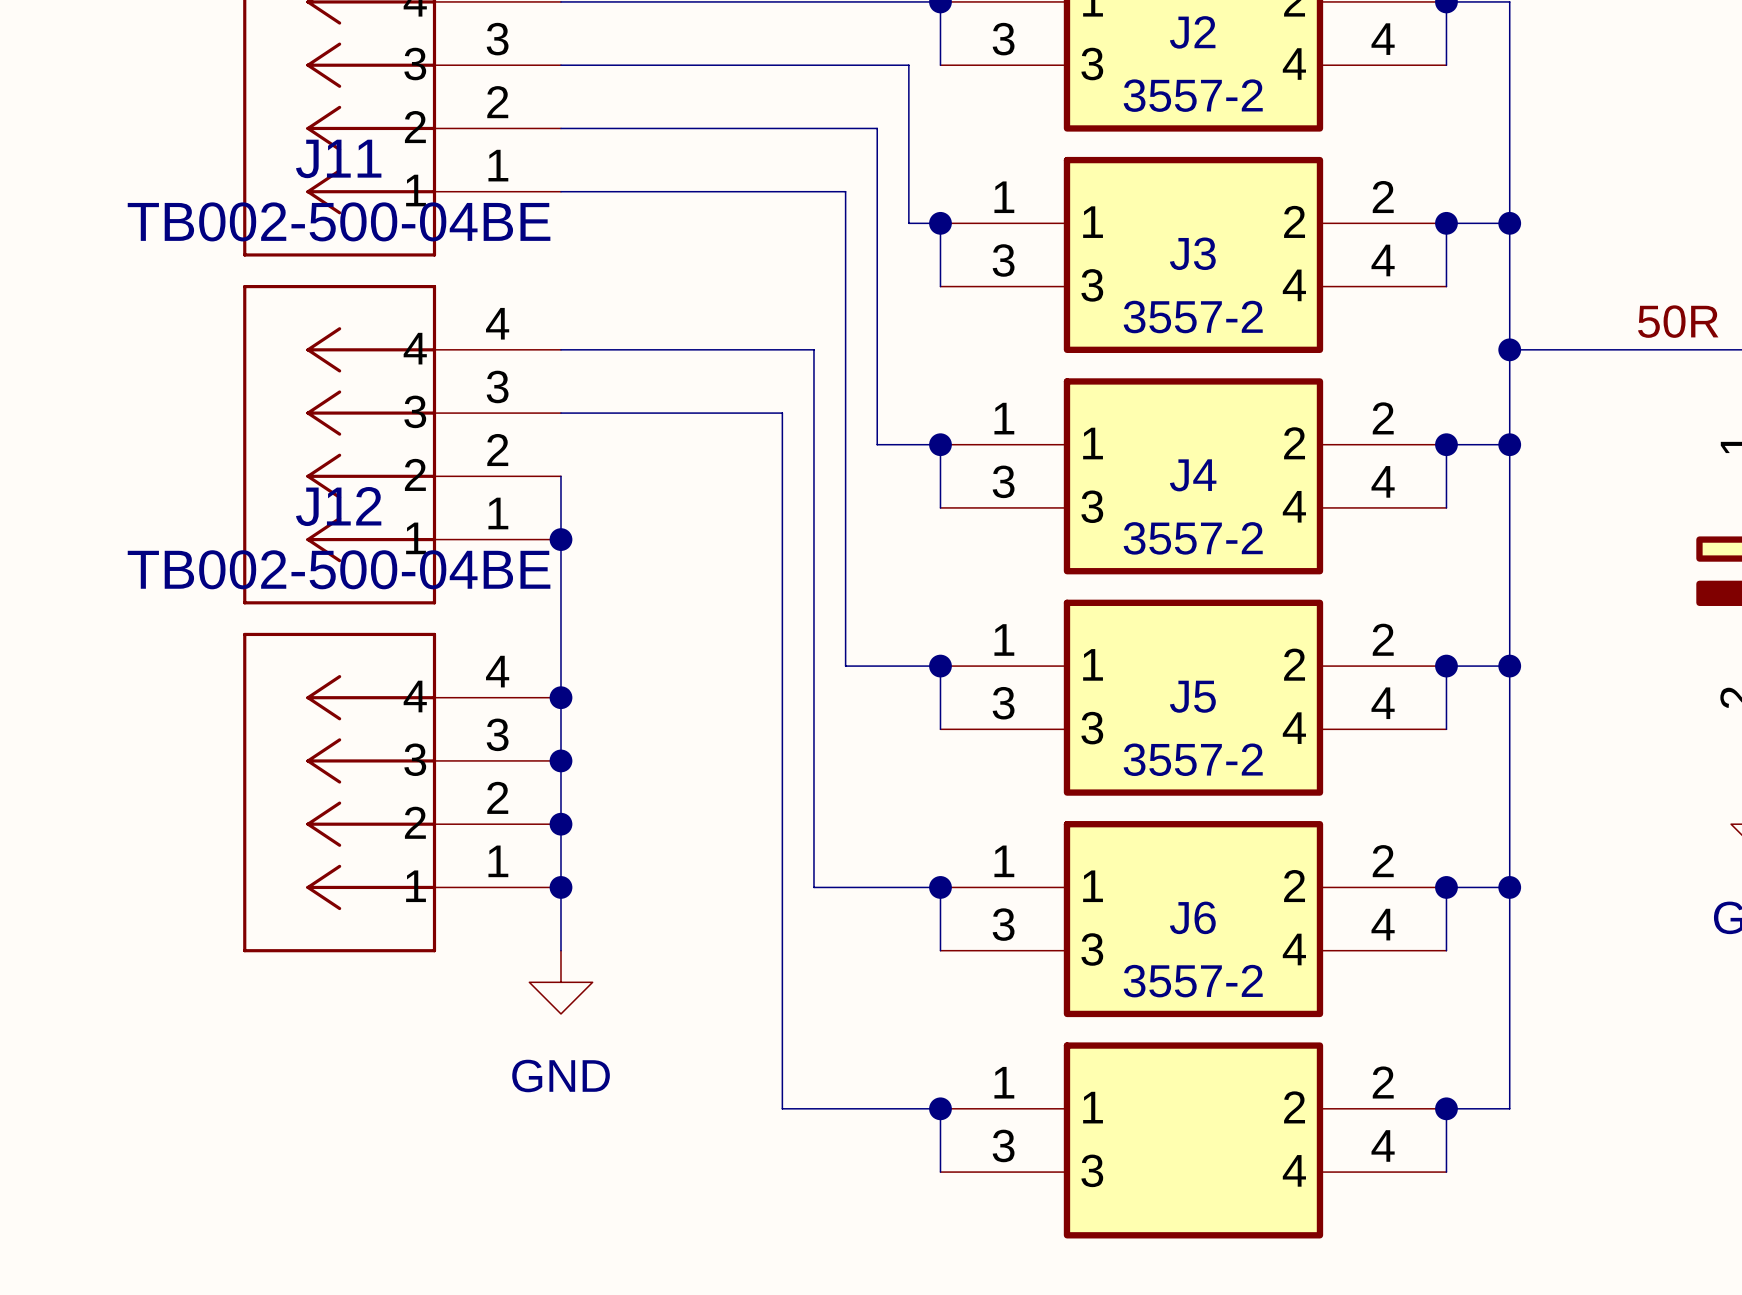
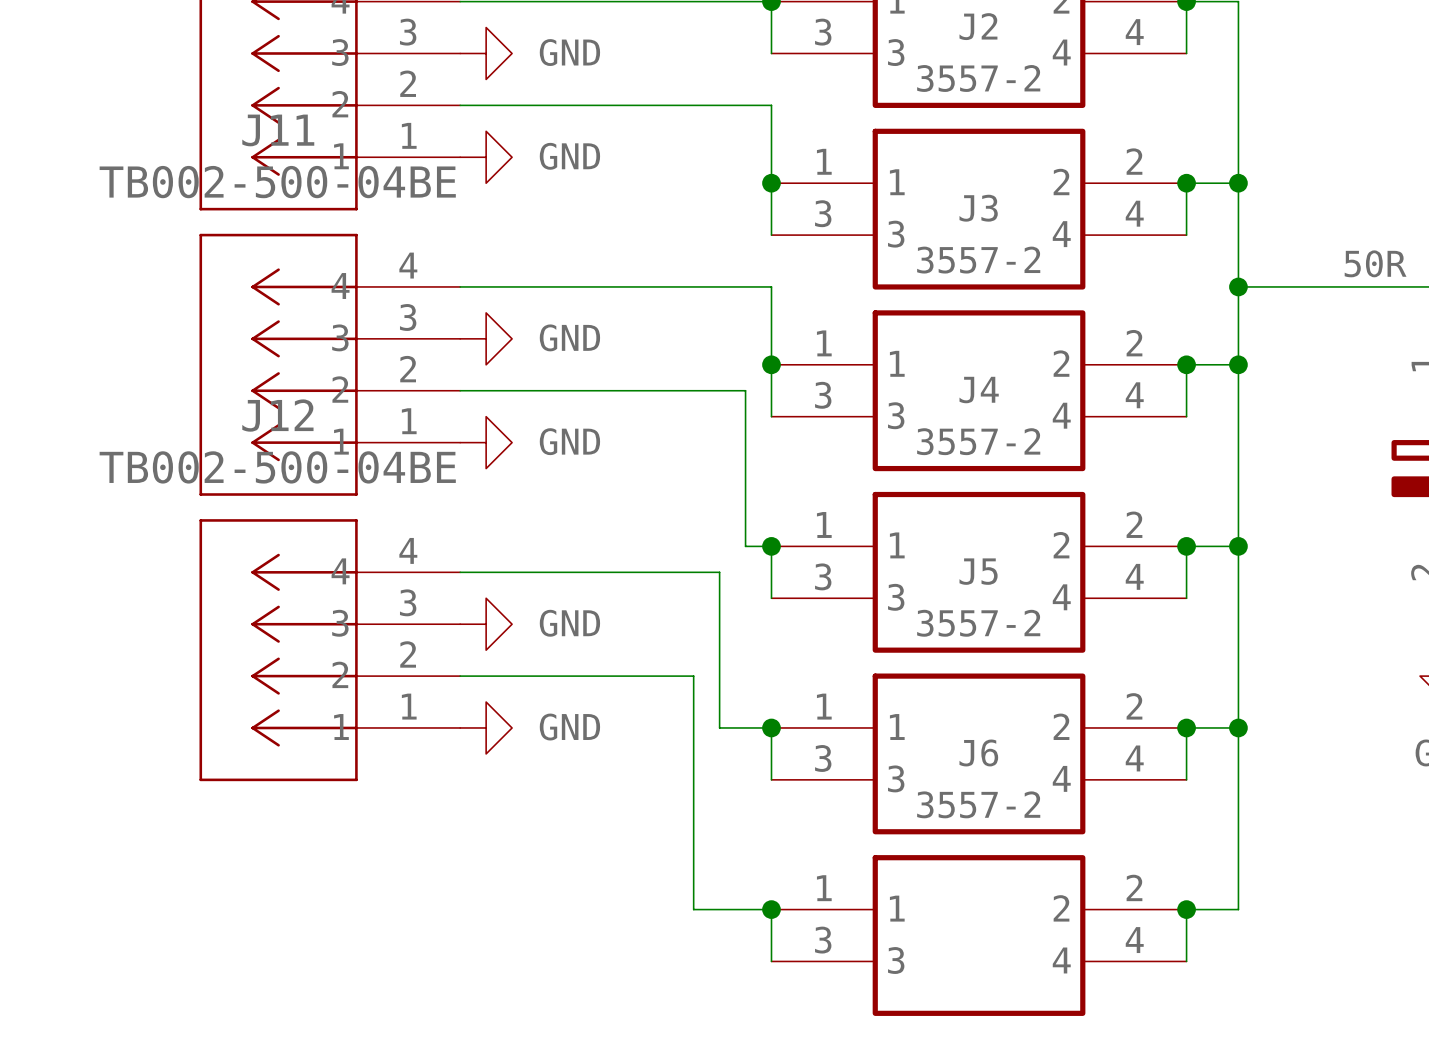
wire: (560, 65) (908, 65) (908, 223) (940, 223) -> none
power symbol: none -> GND (486, 53)
wire: (877, 128) (877, 444) (940, 444) -> (719, 105) (771, 105) (771, 183)
wire: (560, 191) (845, 191) (845, 666) (908, 666) -> (460, 390) (745, 390) (745, 546)
power symbol: none -> GND (486, 157)
wire: (813, 349) (813, 887) (877, 887) -> (460, 572) (719, 572) (719, 727)
wire: none -> (667, 286) (771, 286) (771, 364)
wire: (560, 413) (782, 413) (782, 1108) (845, 1108) -> (460, 676) (693, 676) (693, 909)
power symbol: none -> GND (486, 338)
wire: (560, 476) (560, 950) -> none
junction: (560, 539) -> none
power symbol: none -> GND (486, 442)
junction: (560, 697) -> none
junction: (560, 760) -> none
power symbol: none -> GND (486, 624)
junction: (560, 824) -> none
junction: (560, 887) -> none
power symbol rotation: 0° (560, 982) -> 90° counterclockwise (486, 727)
power symbol position: GND (560, 982) -> GND (486, 727)

